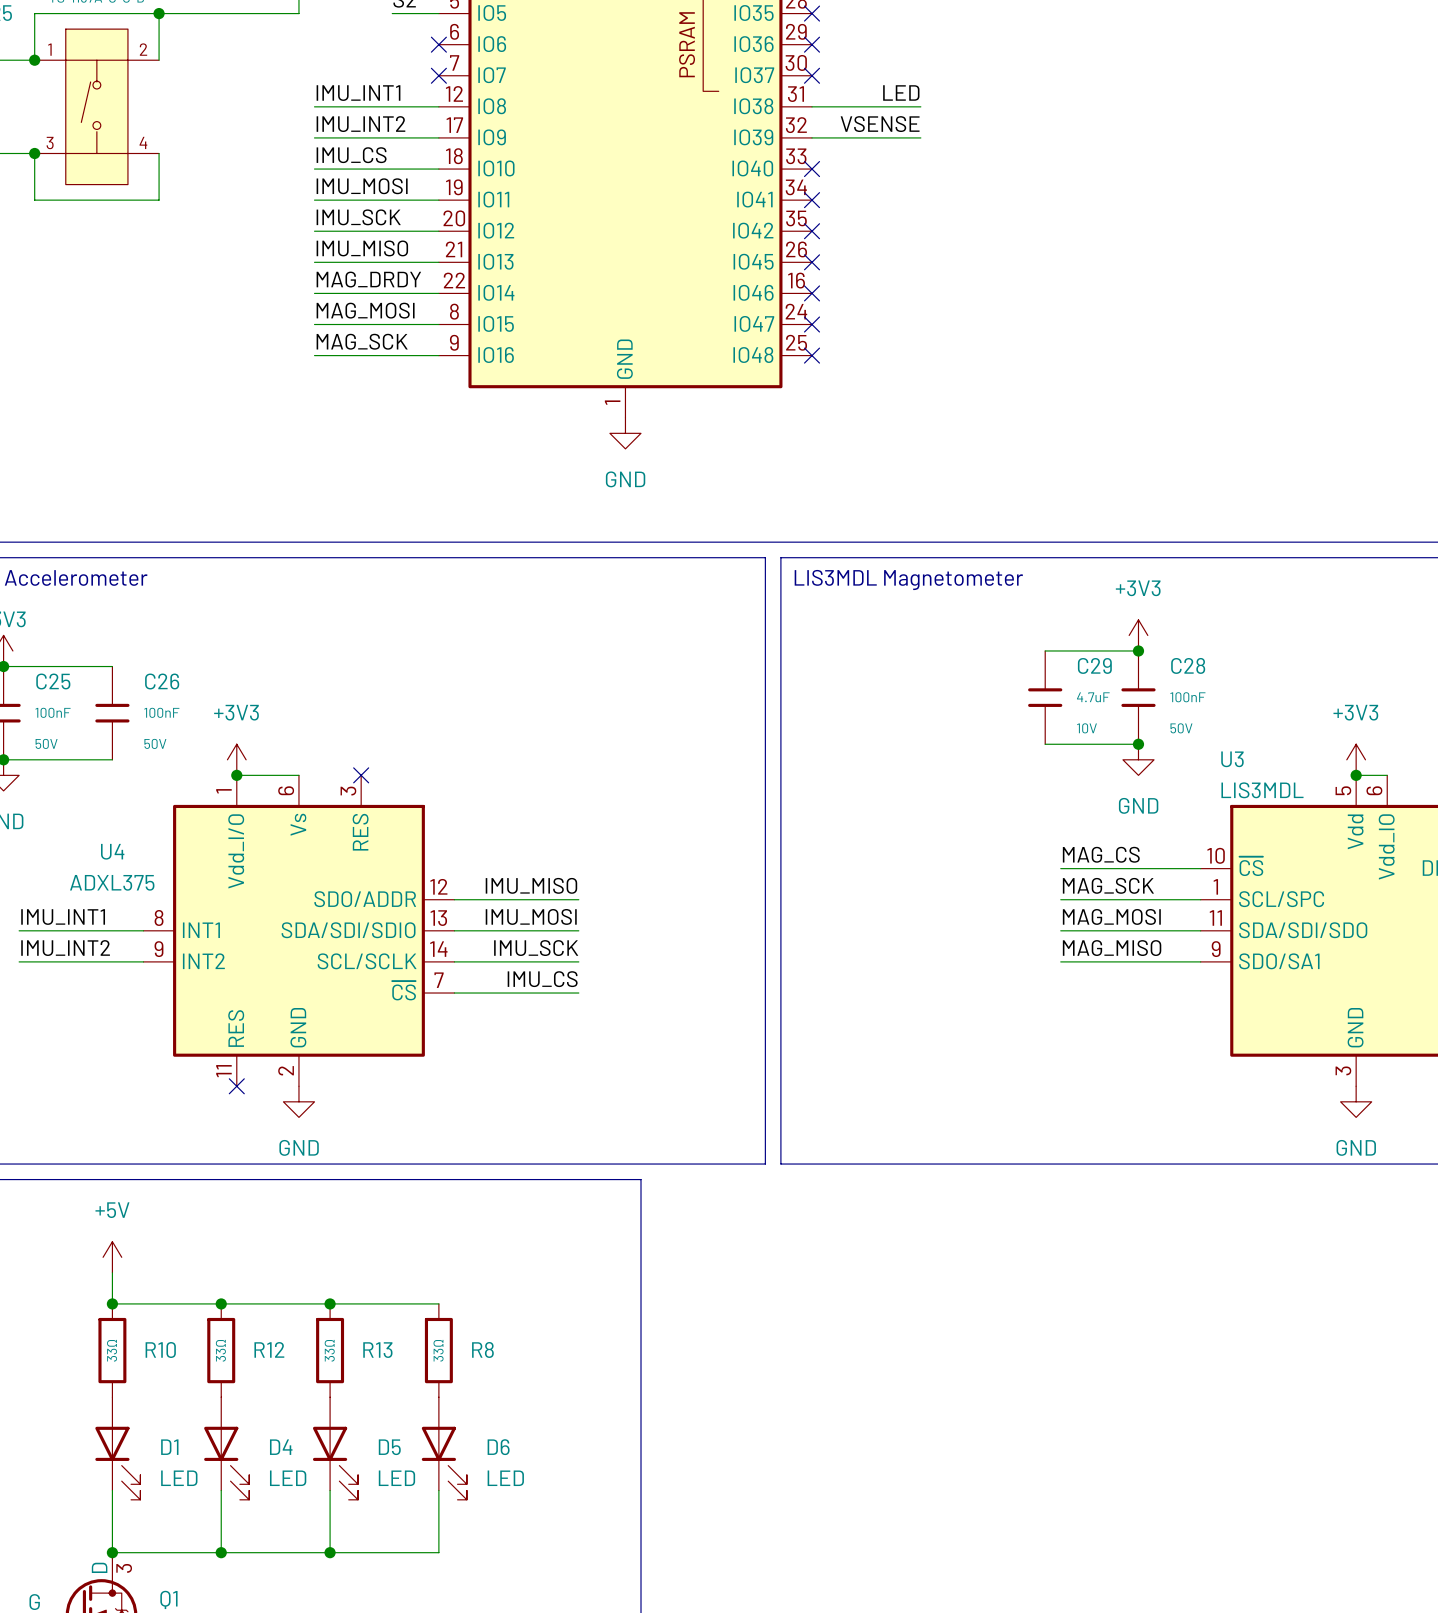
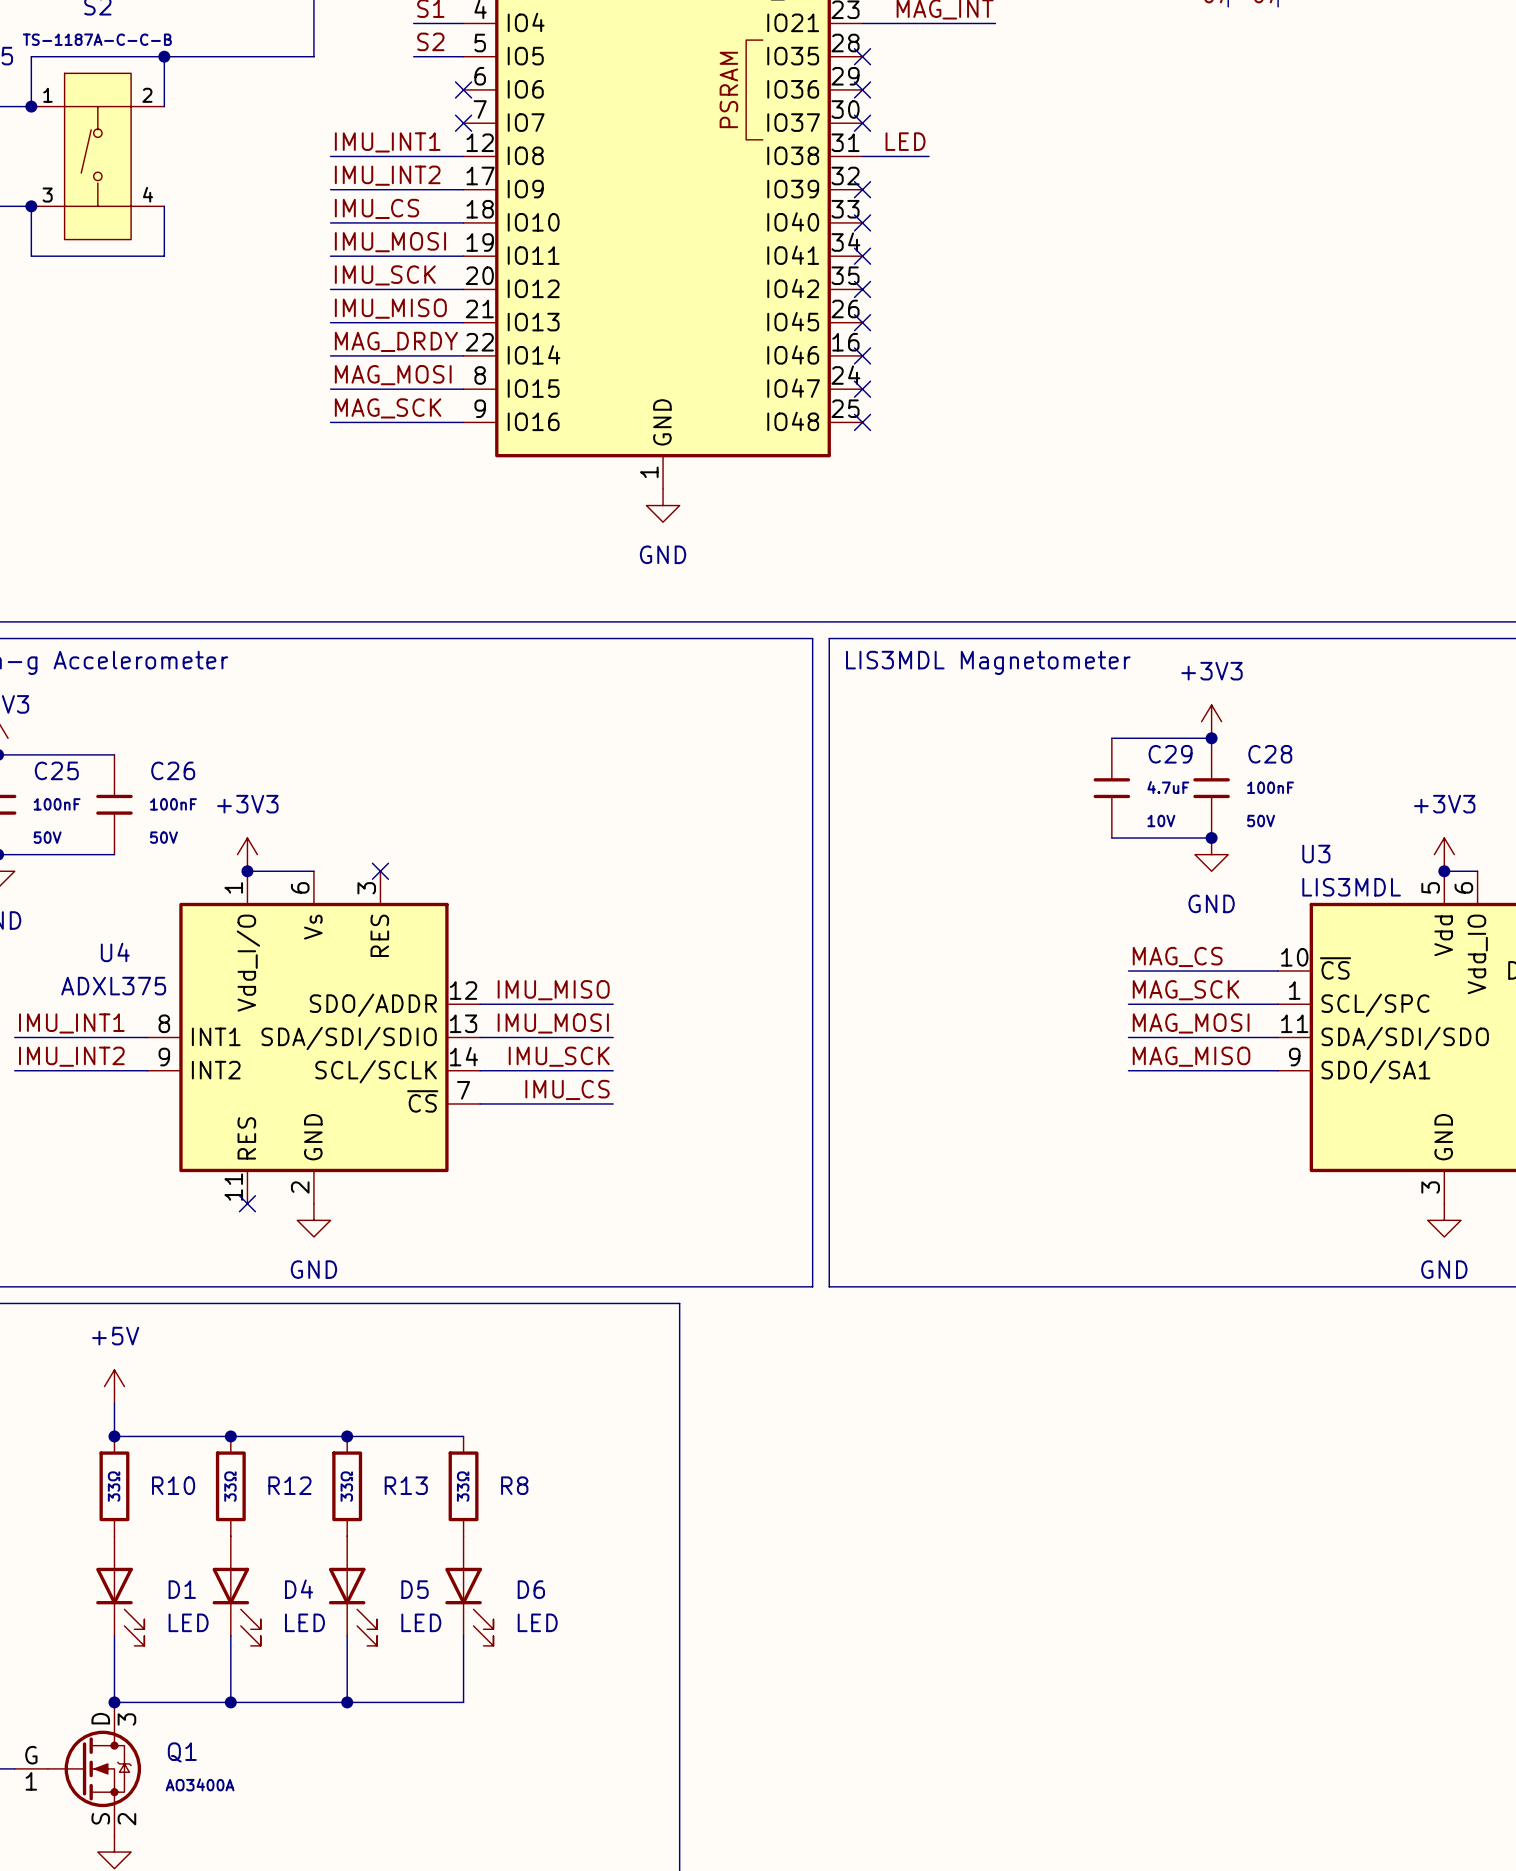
label position: LED (901, 92) -> LED (905, 141)
wire: (874, 106) (920, 106) -> none
label: VSENSE (880, 124) -> none
wire: (812, 137) (920, 137) -> none
no-connect mark: none -> (862, 189)

